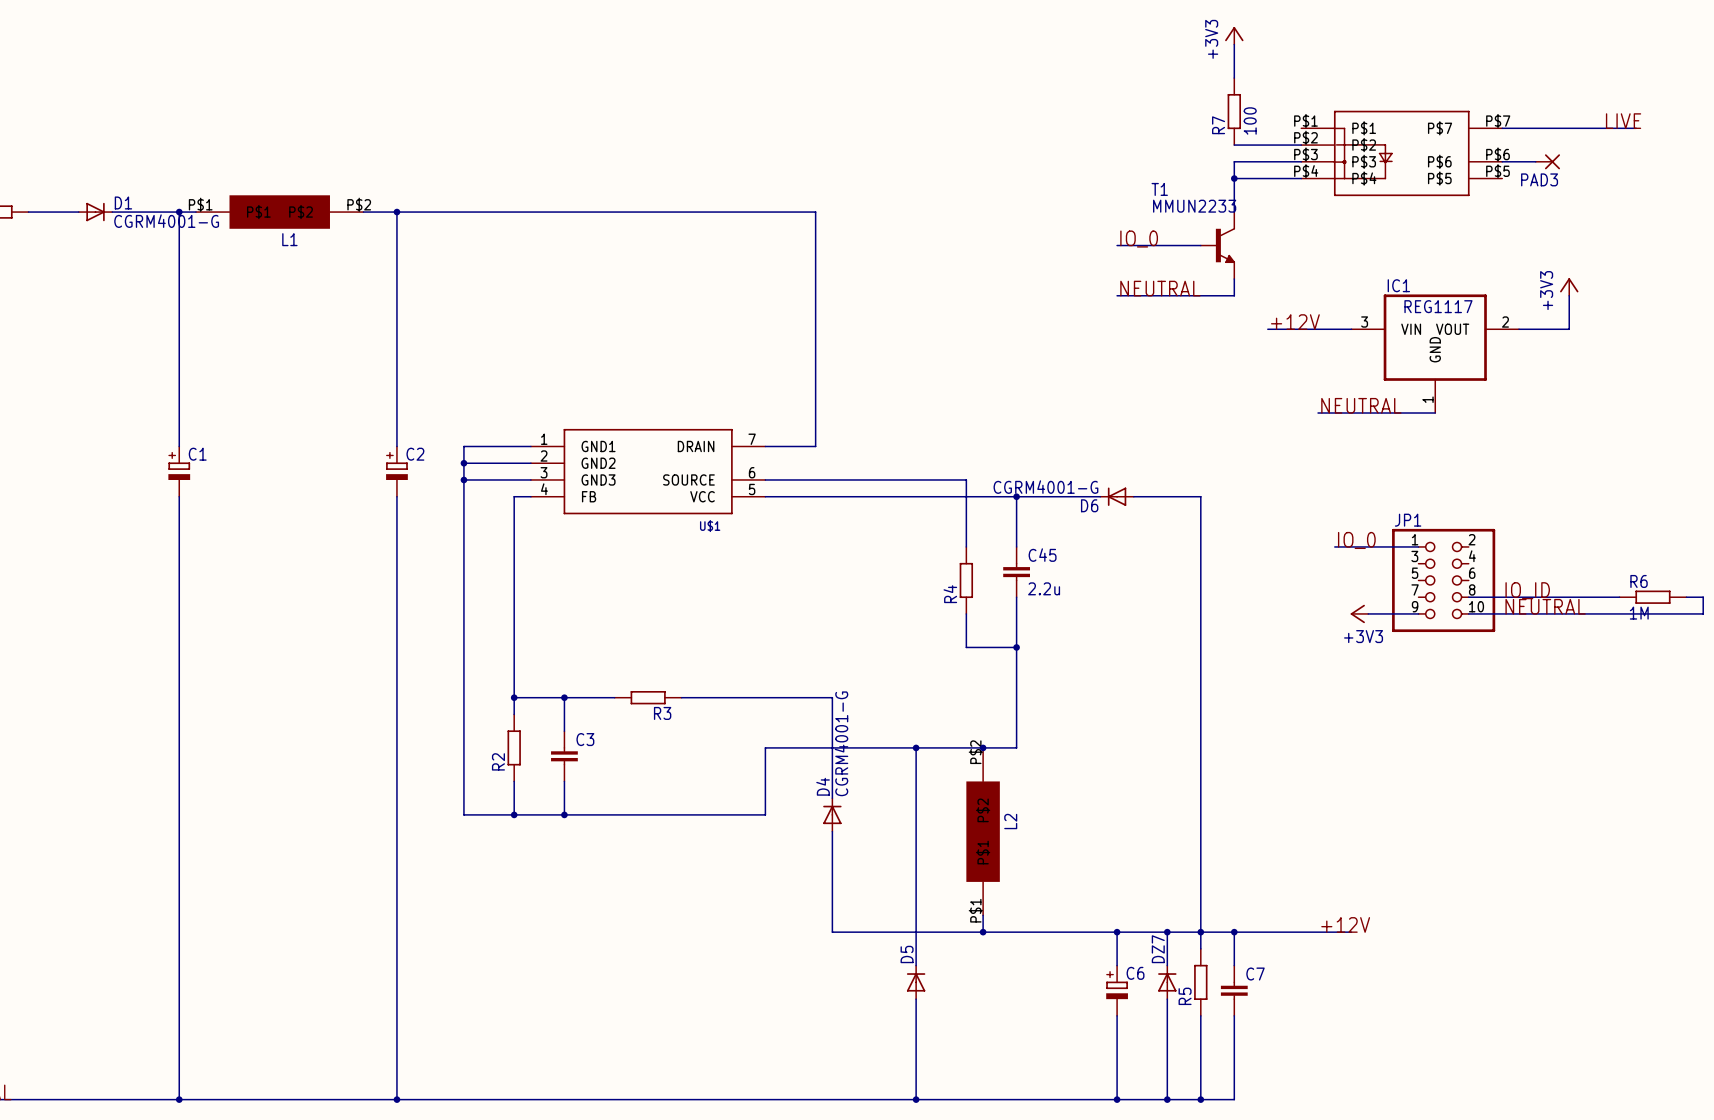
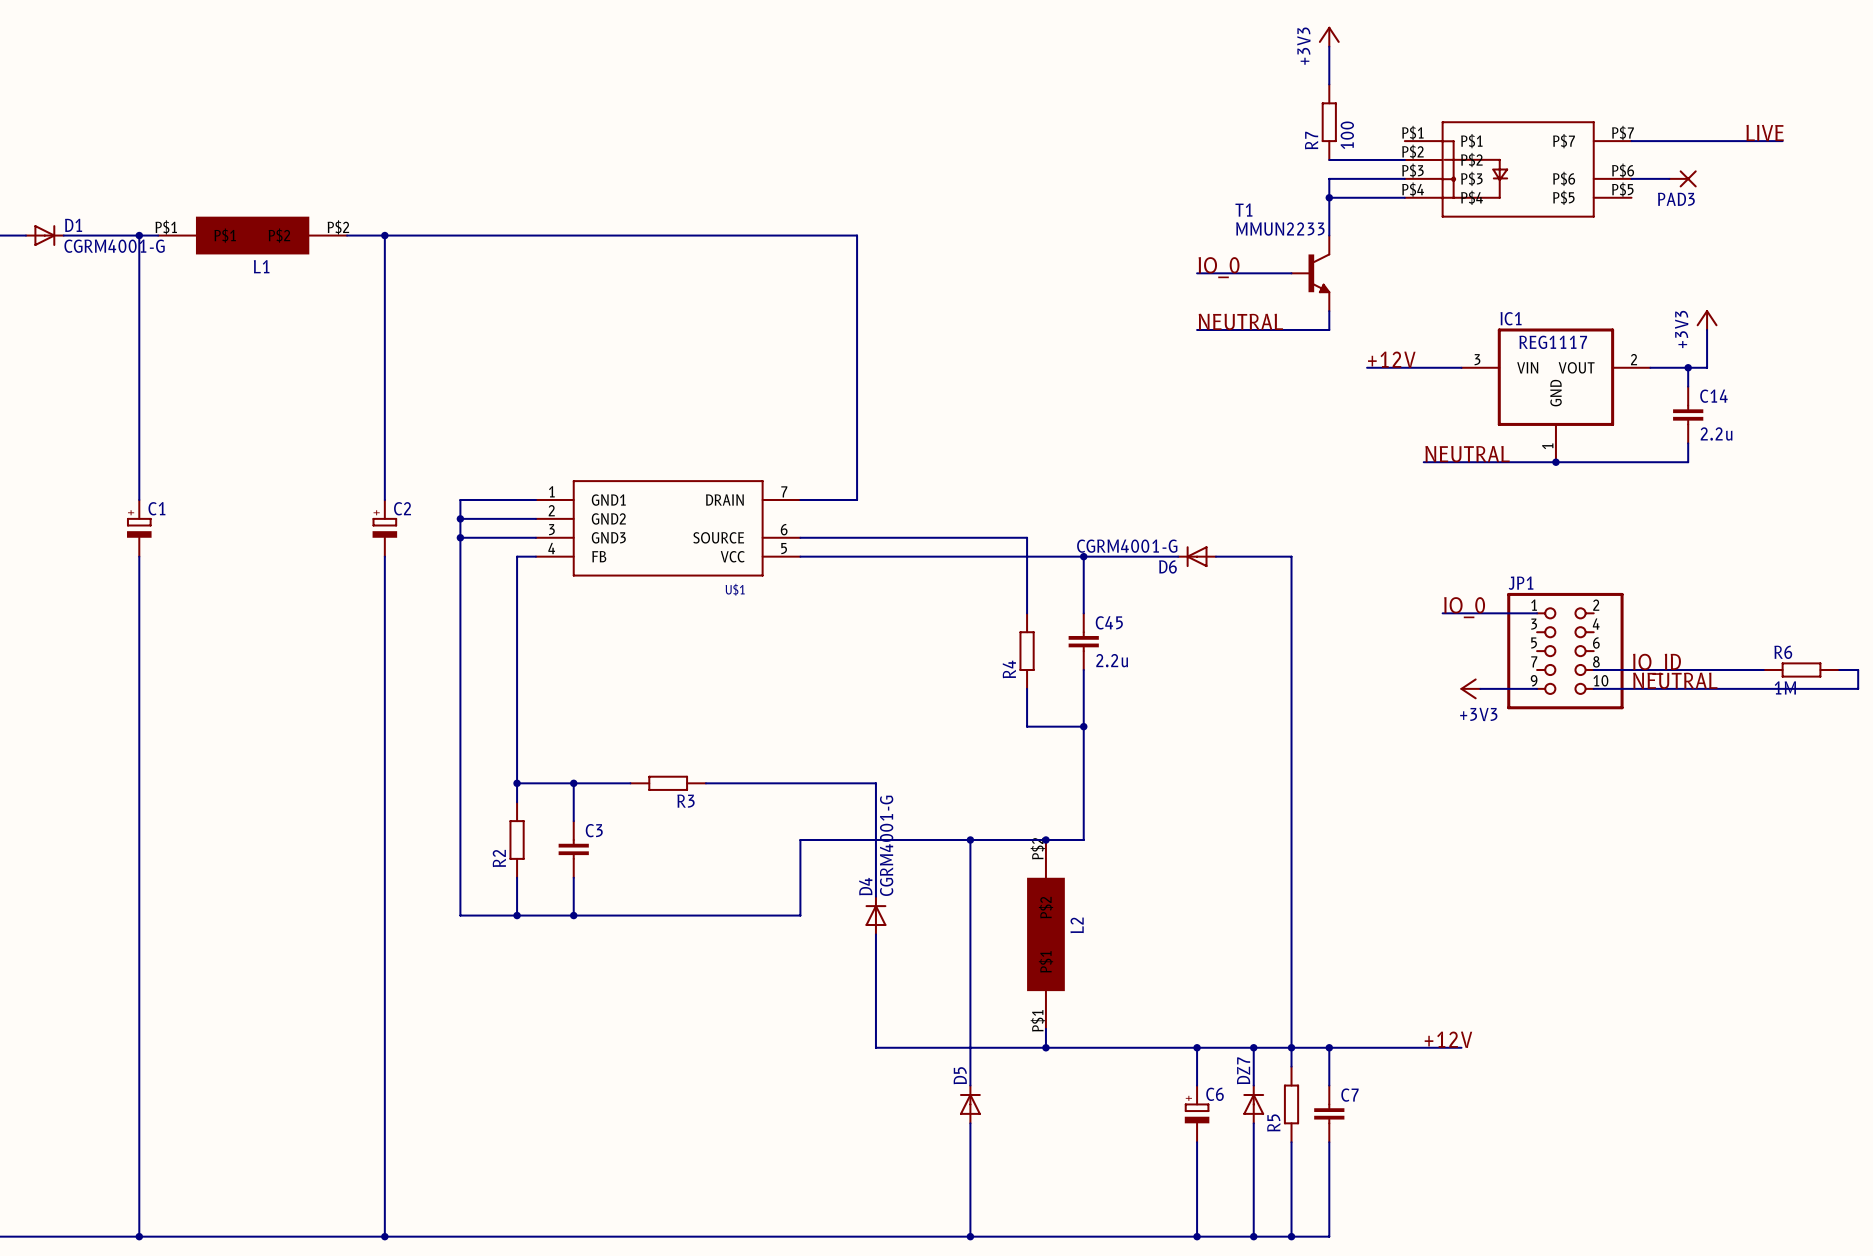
wire: none -> (1688, 367) (1688, 386)
junction: none -> (1688, 367)
C14: none -> 2.2u (1688, 414)
wire: none -> (1688, 443) (1688, 462) (1555, 462)
junction: none -> (1555, 462)

